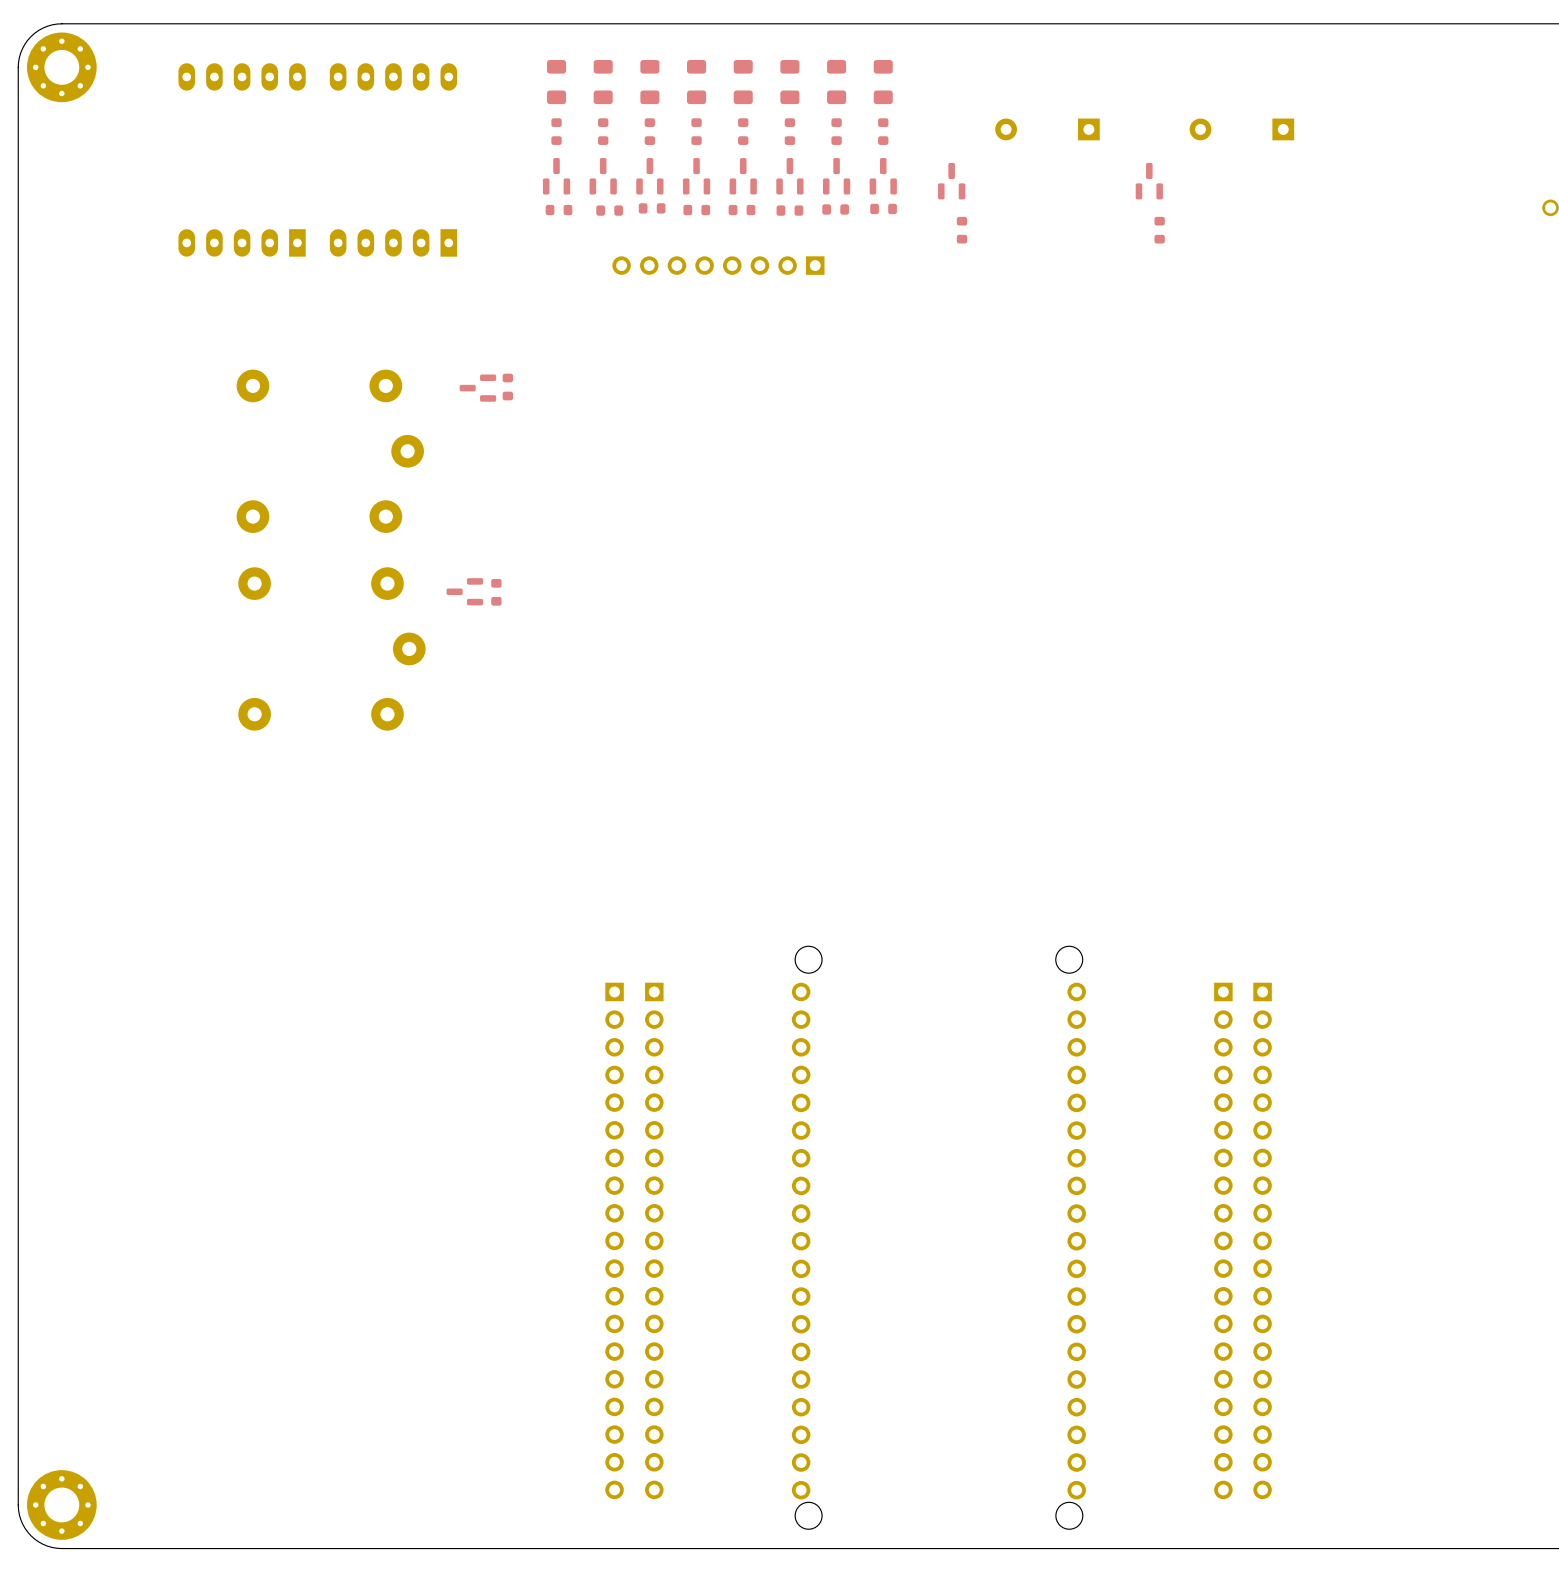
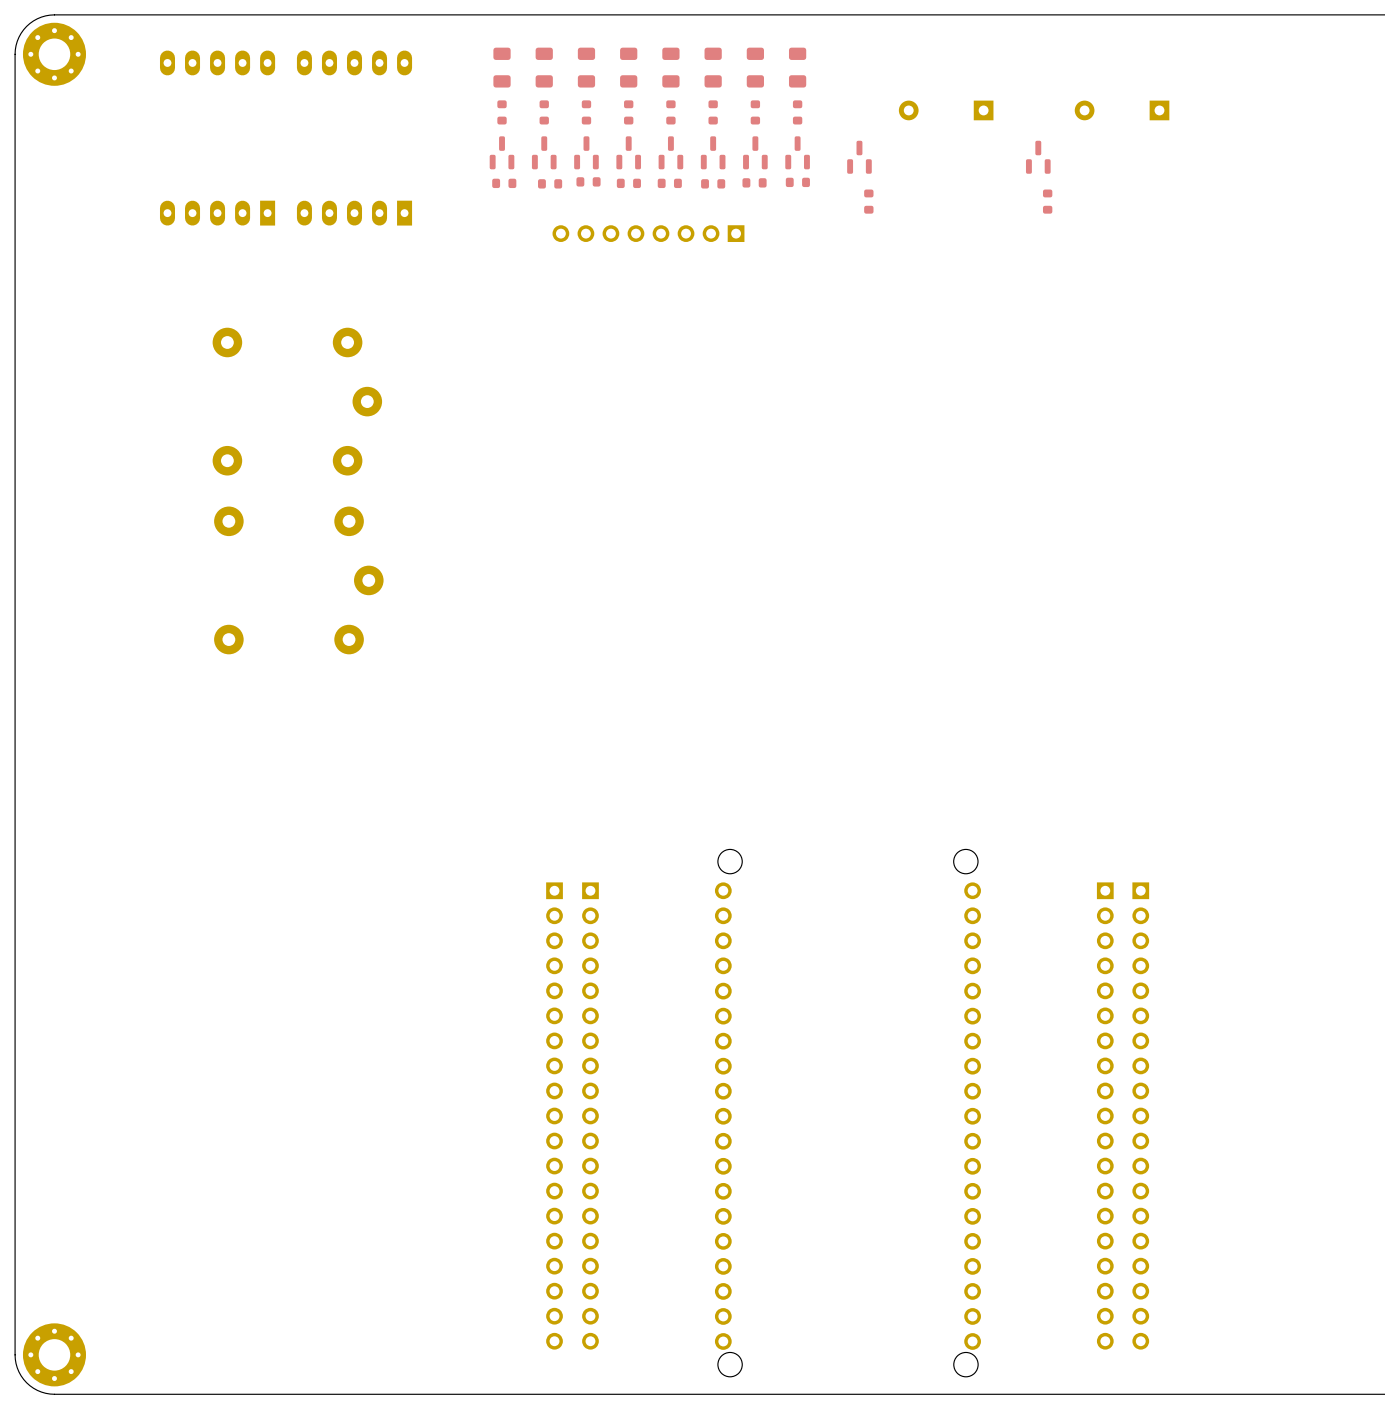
part: (507, 387) -> none
part: (477, 388) -> none
part: (464, 591) -> none
part: (496, 592) -> none

